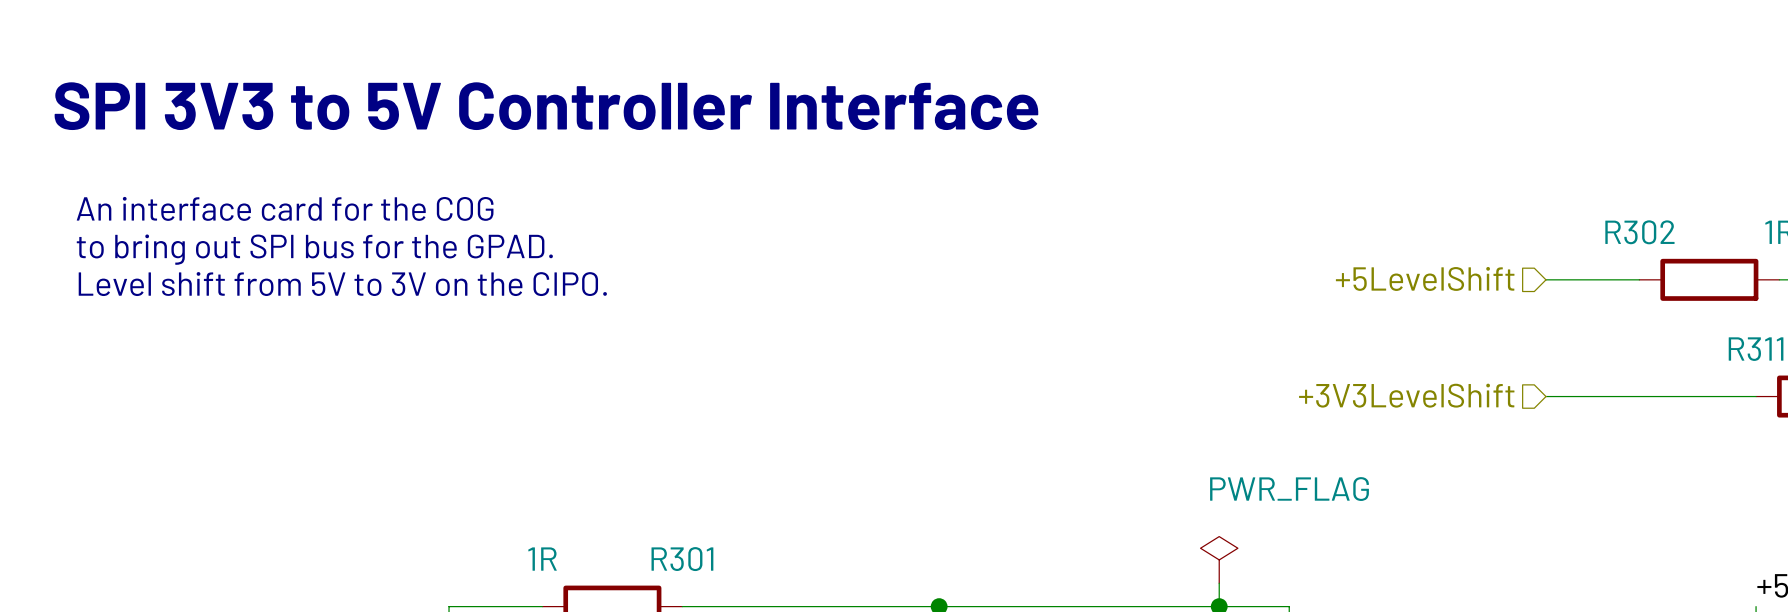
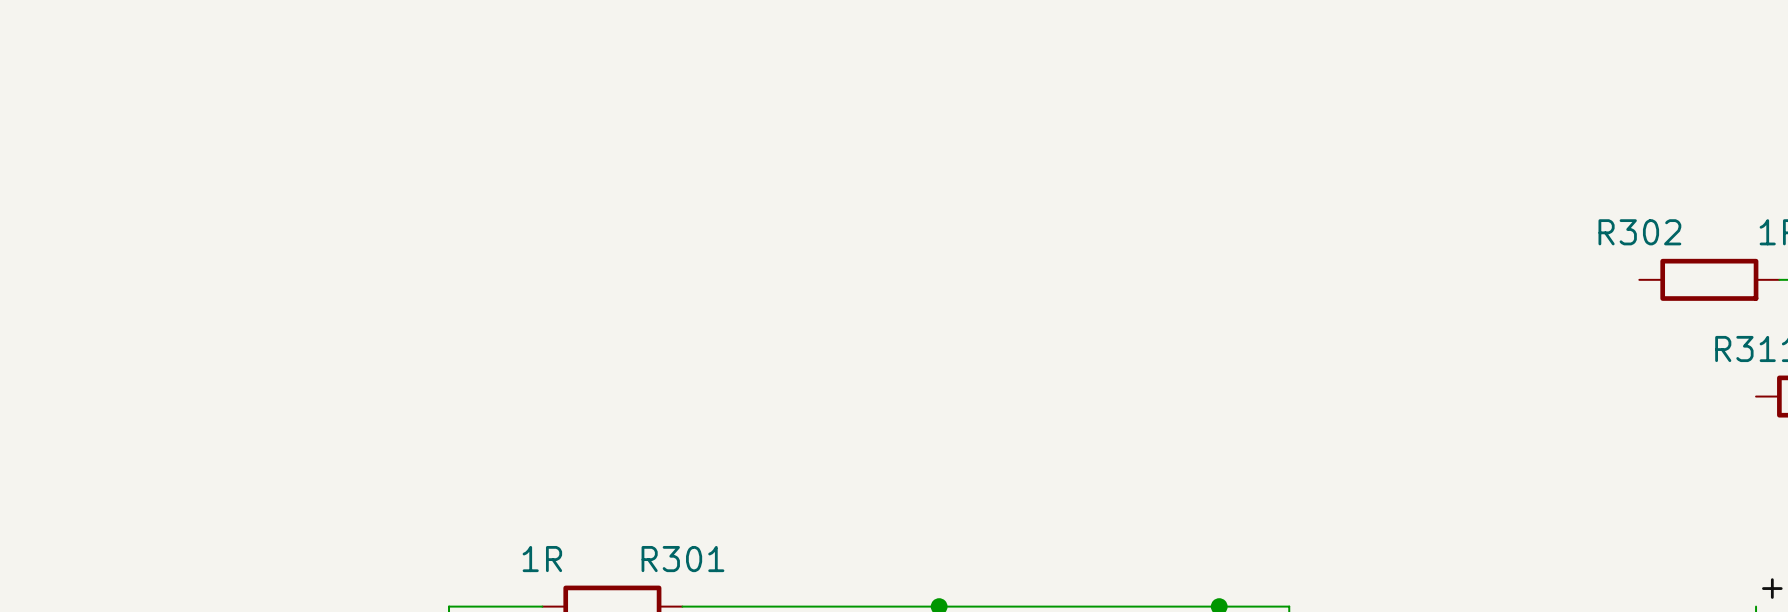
text: SPI 3V3 to 5V Controller Interface (546, 106) -> none
text: An interface card for the COG (285, 208) -> none
text: to bring out SPI bus for the GPAD. (314, 249) -> none
hierarchical label: +5LevelShift (1425, 278) -> none
wire: (1545, 279) (1639, 279) -> none
text: Level shift from 5V to 3V on the CIPO. (342, 284) -> none
hierarchical label: +3V3LevelShift (1406, 395) -> none
wire: (1545, 396) (1756, 396) -> none
power symbol: PWR_FLAG (1219, 559) -> none
wire: (1219, 583) (1219, 606) -> none

